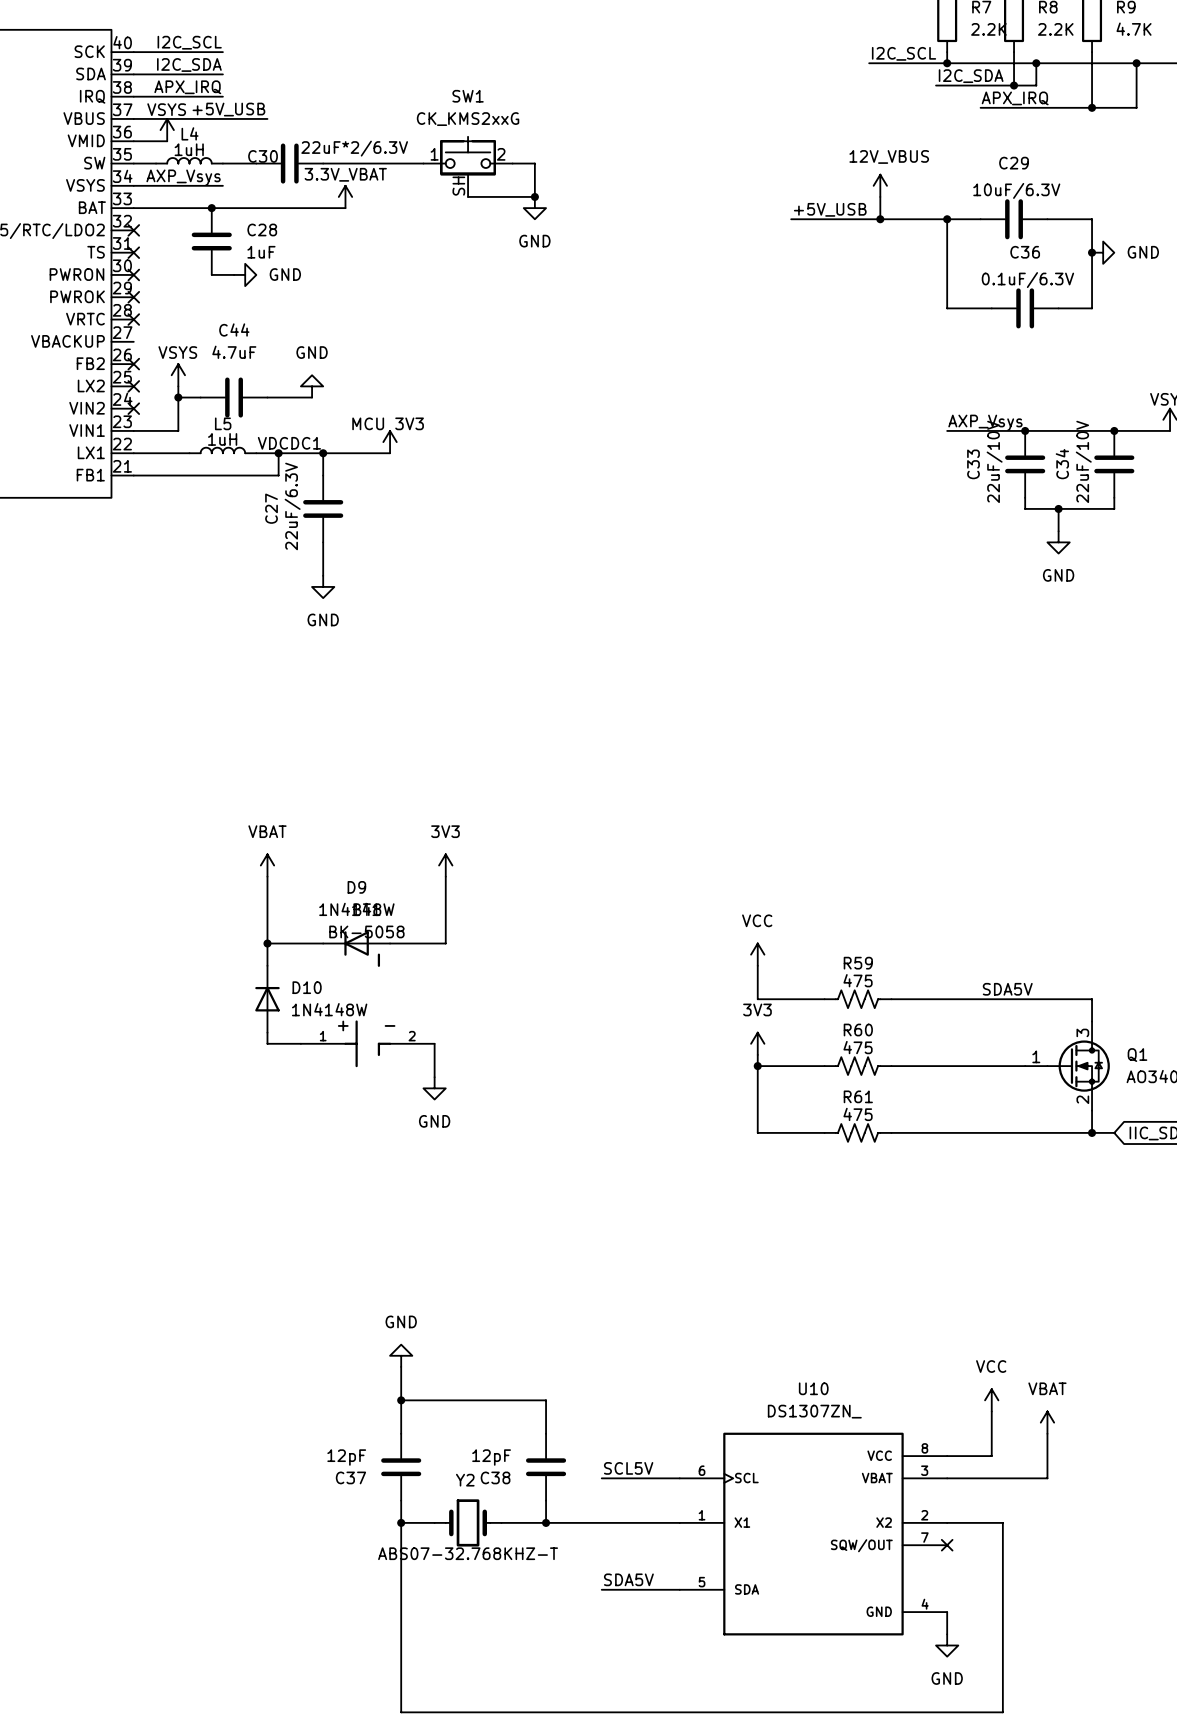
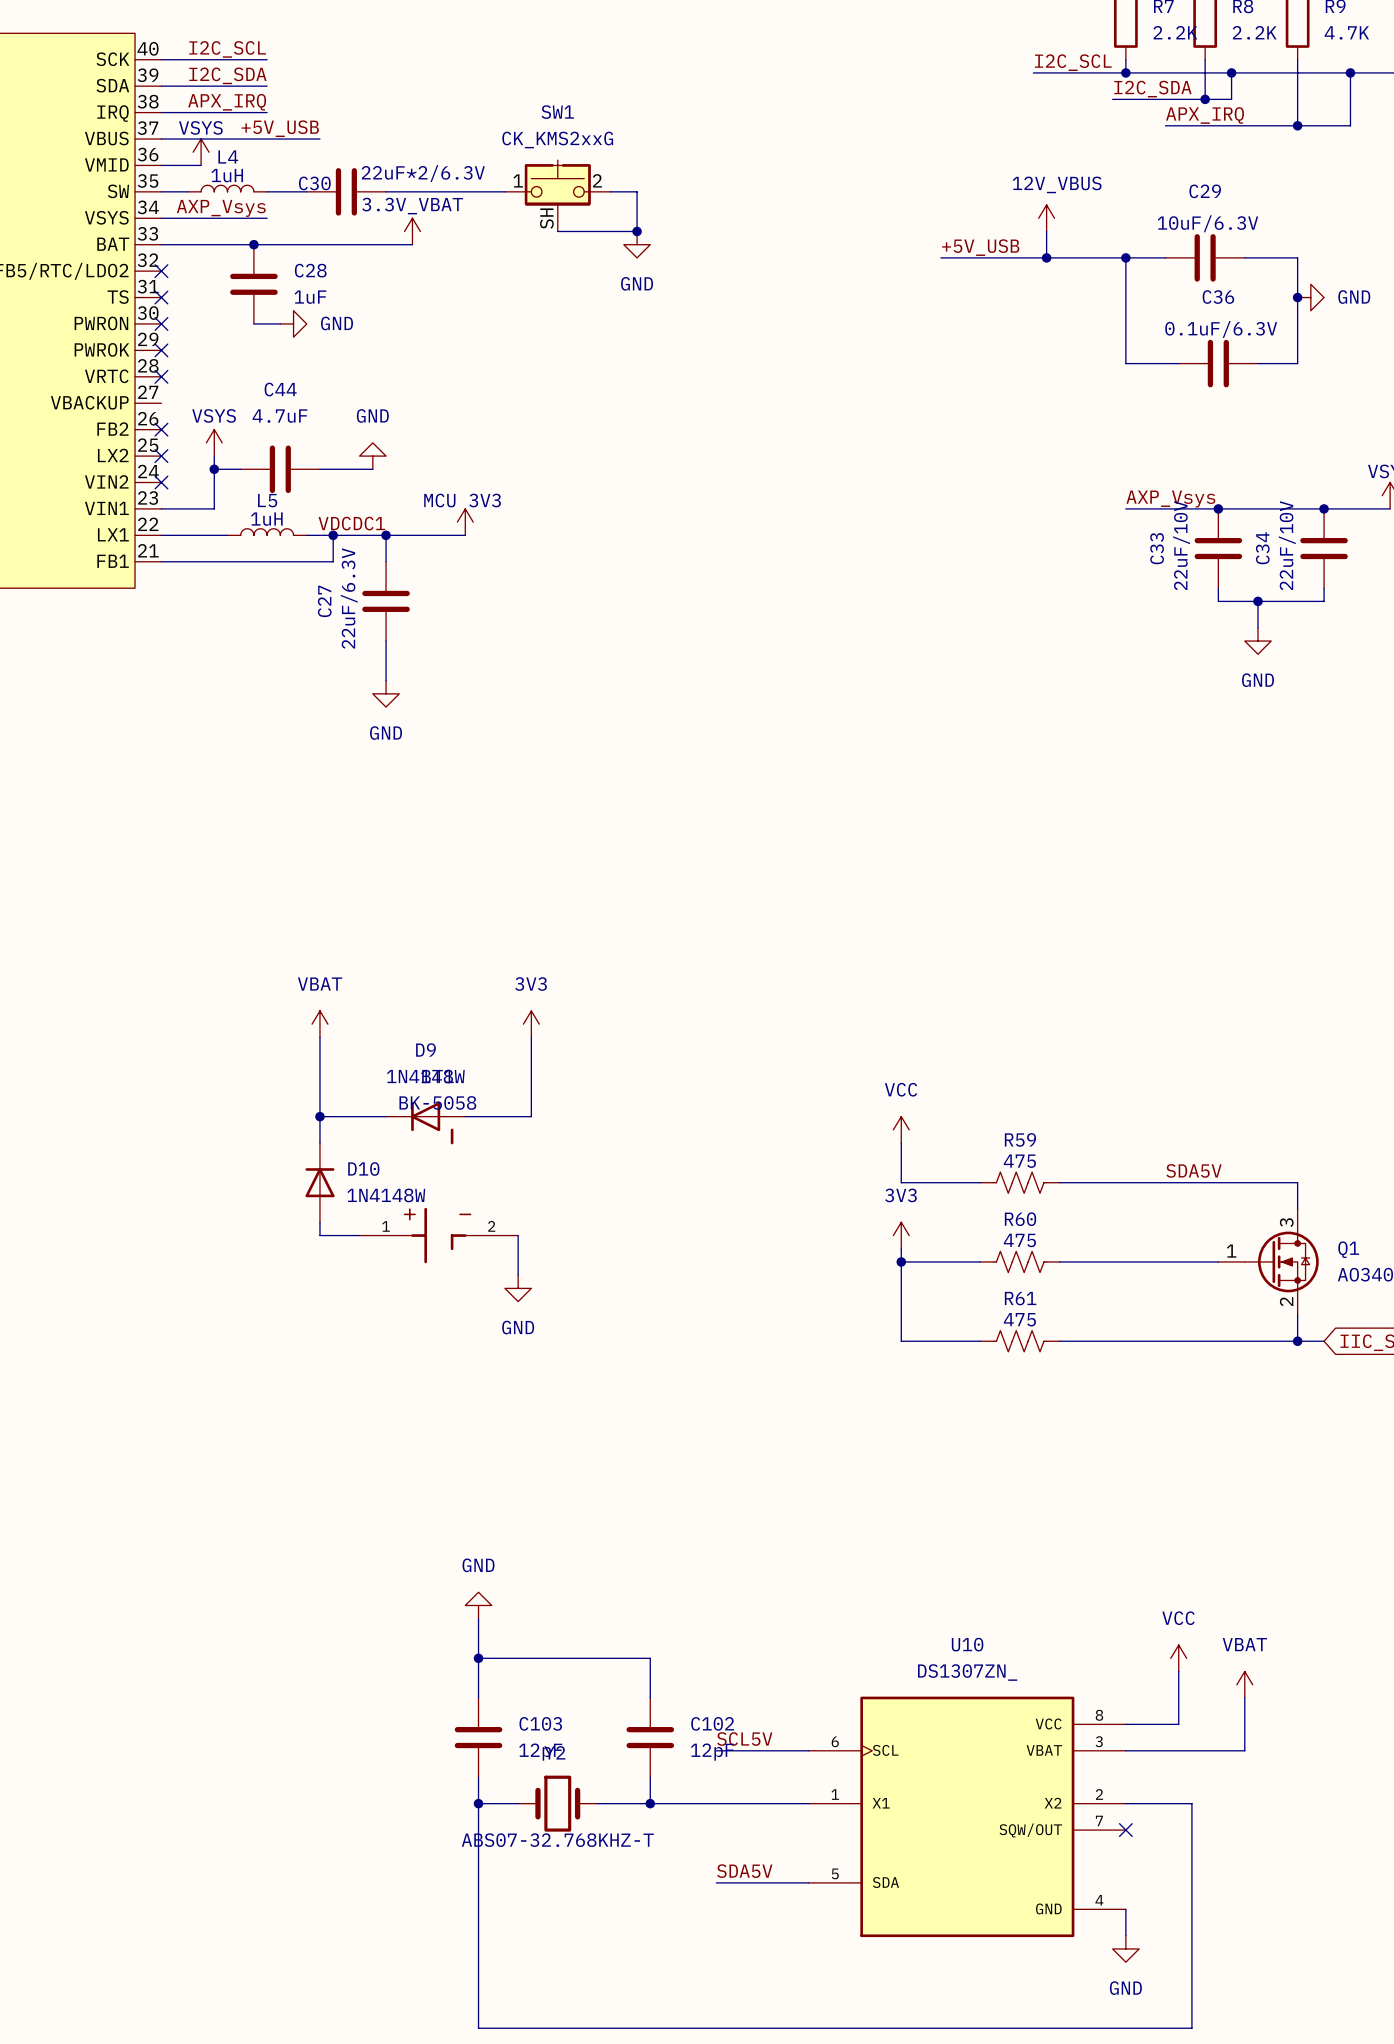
C37 value position: 12pF (346, 1457) -> 12pF (540, 1752)
C38 value position: 12pF (491, 1457) -> 12pF (712, 1752)
C37 name: C37 (350, 1477) -> C103 (540, 1723)
C38 name: C38 (495, 1477) -> C102 (712, 1723)

